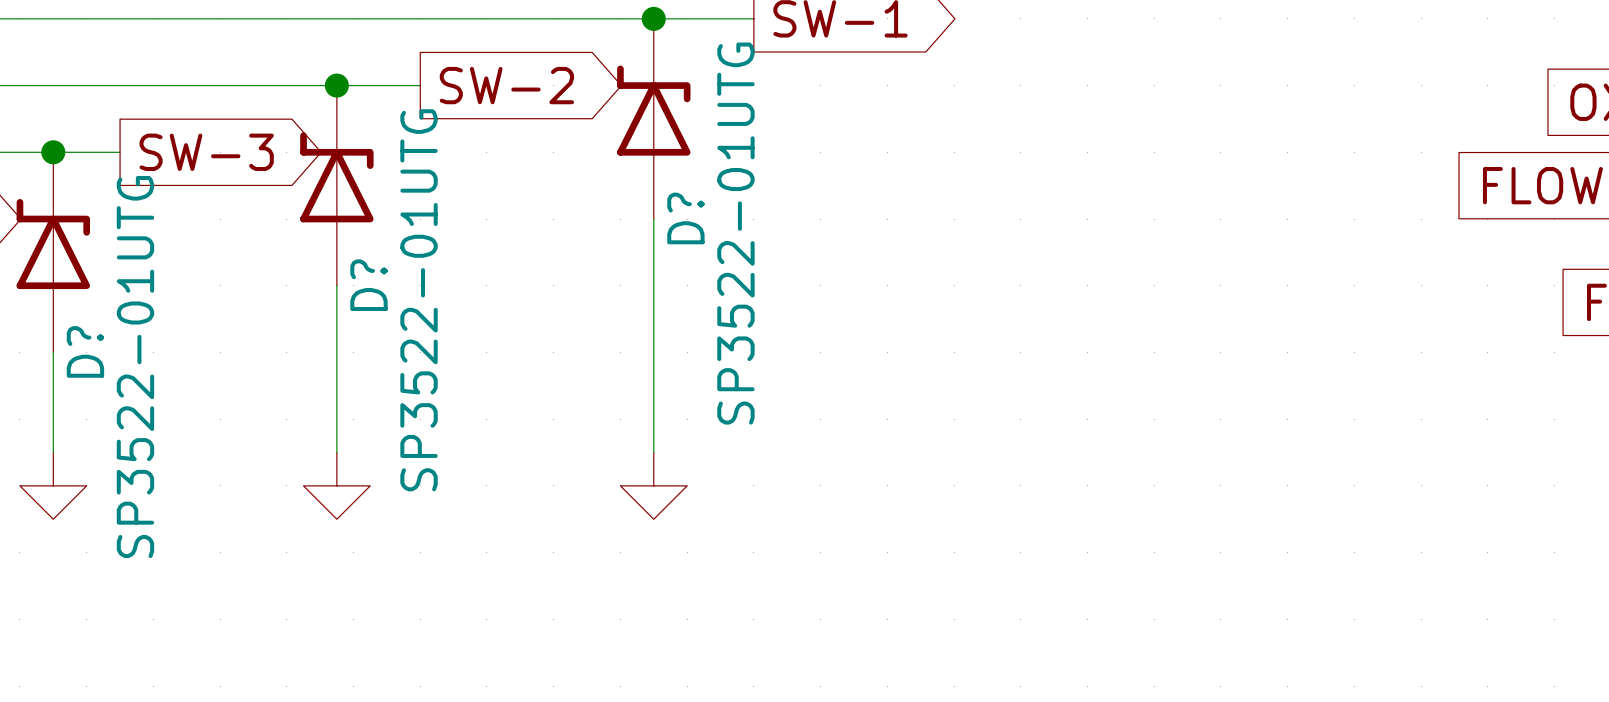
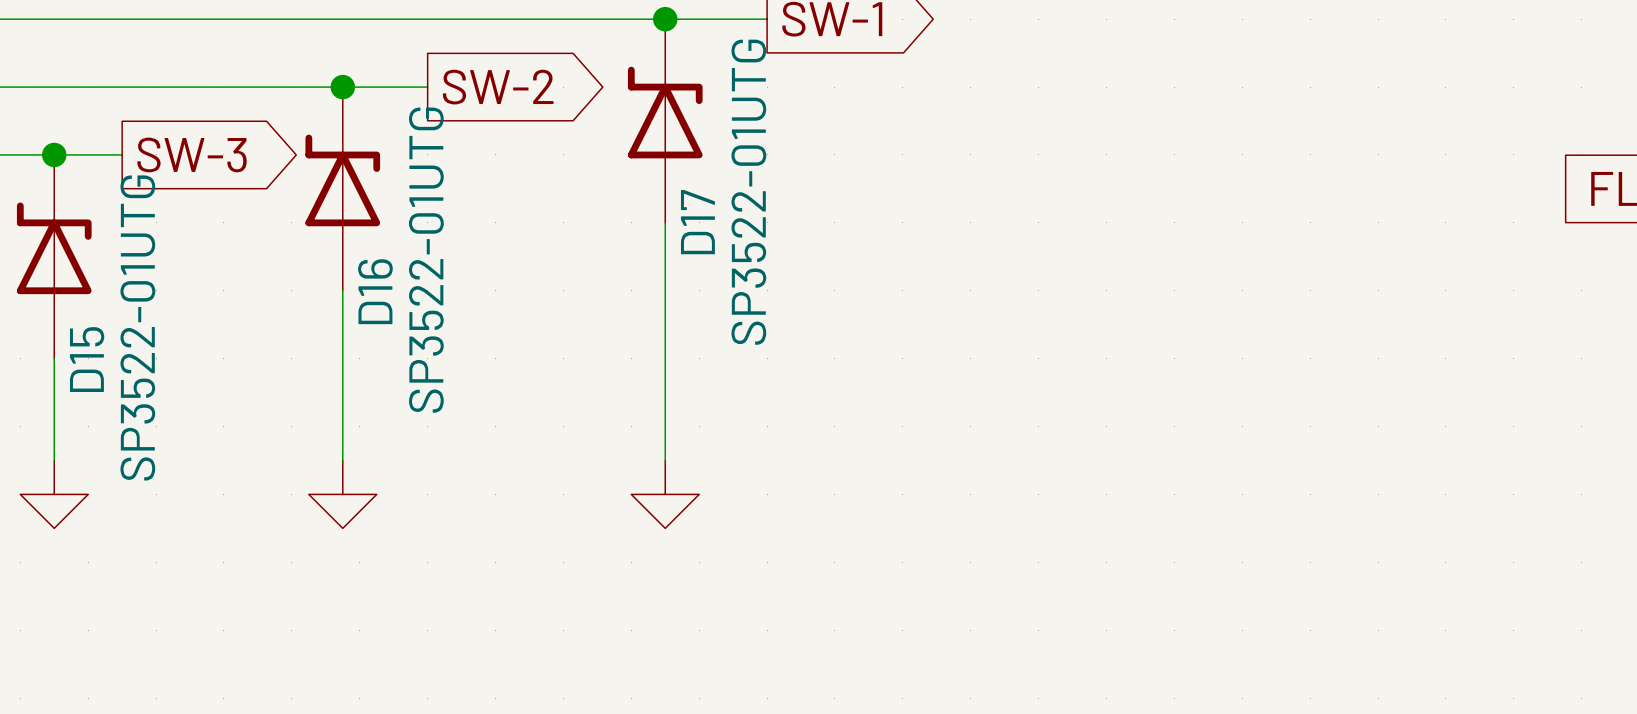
D? name: D? (685, 218) -> D17 (697, 222)
D? name: D? (368, 285) -> D16 (375, 291)
D? name: D? (85, 351) -> D15 (87, 359)

